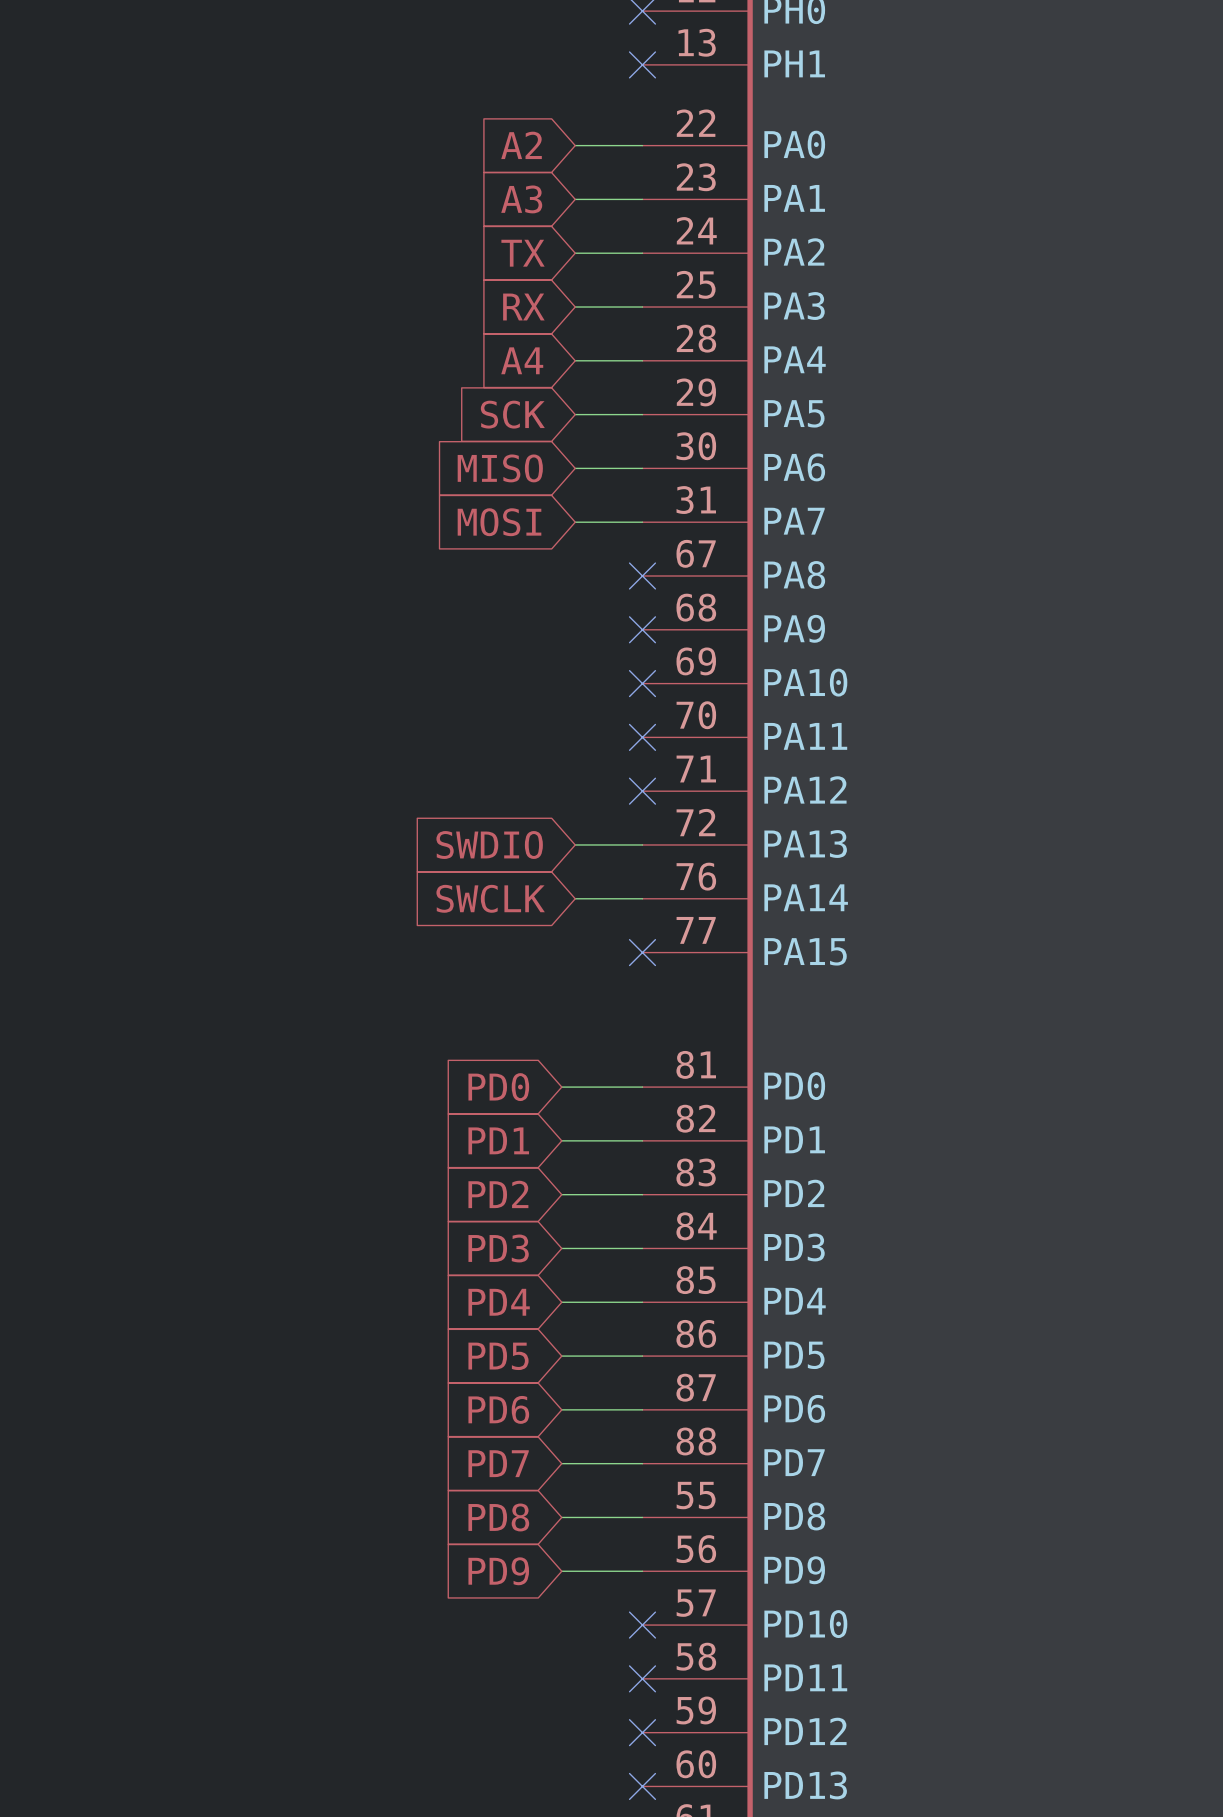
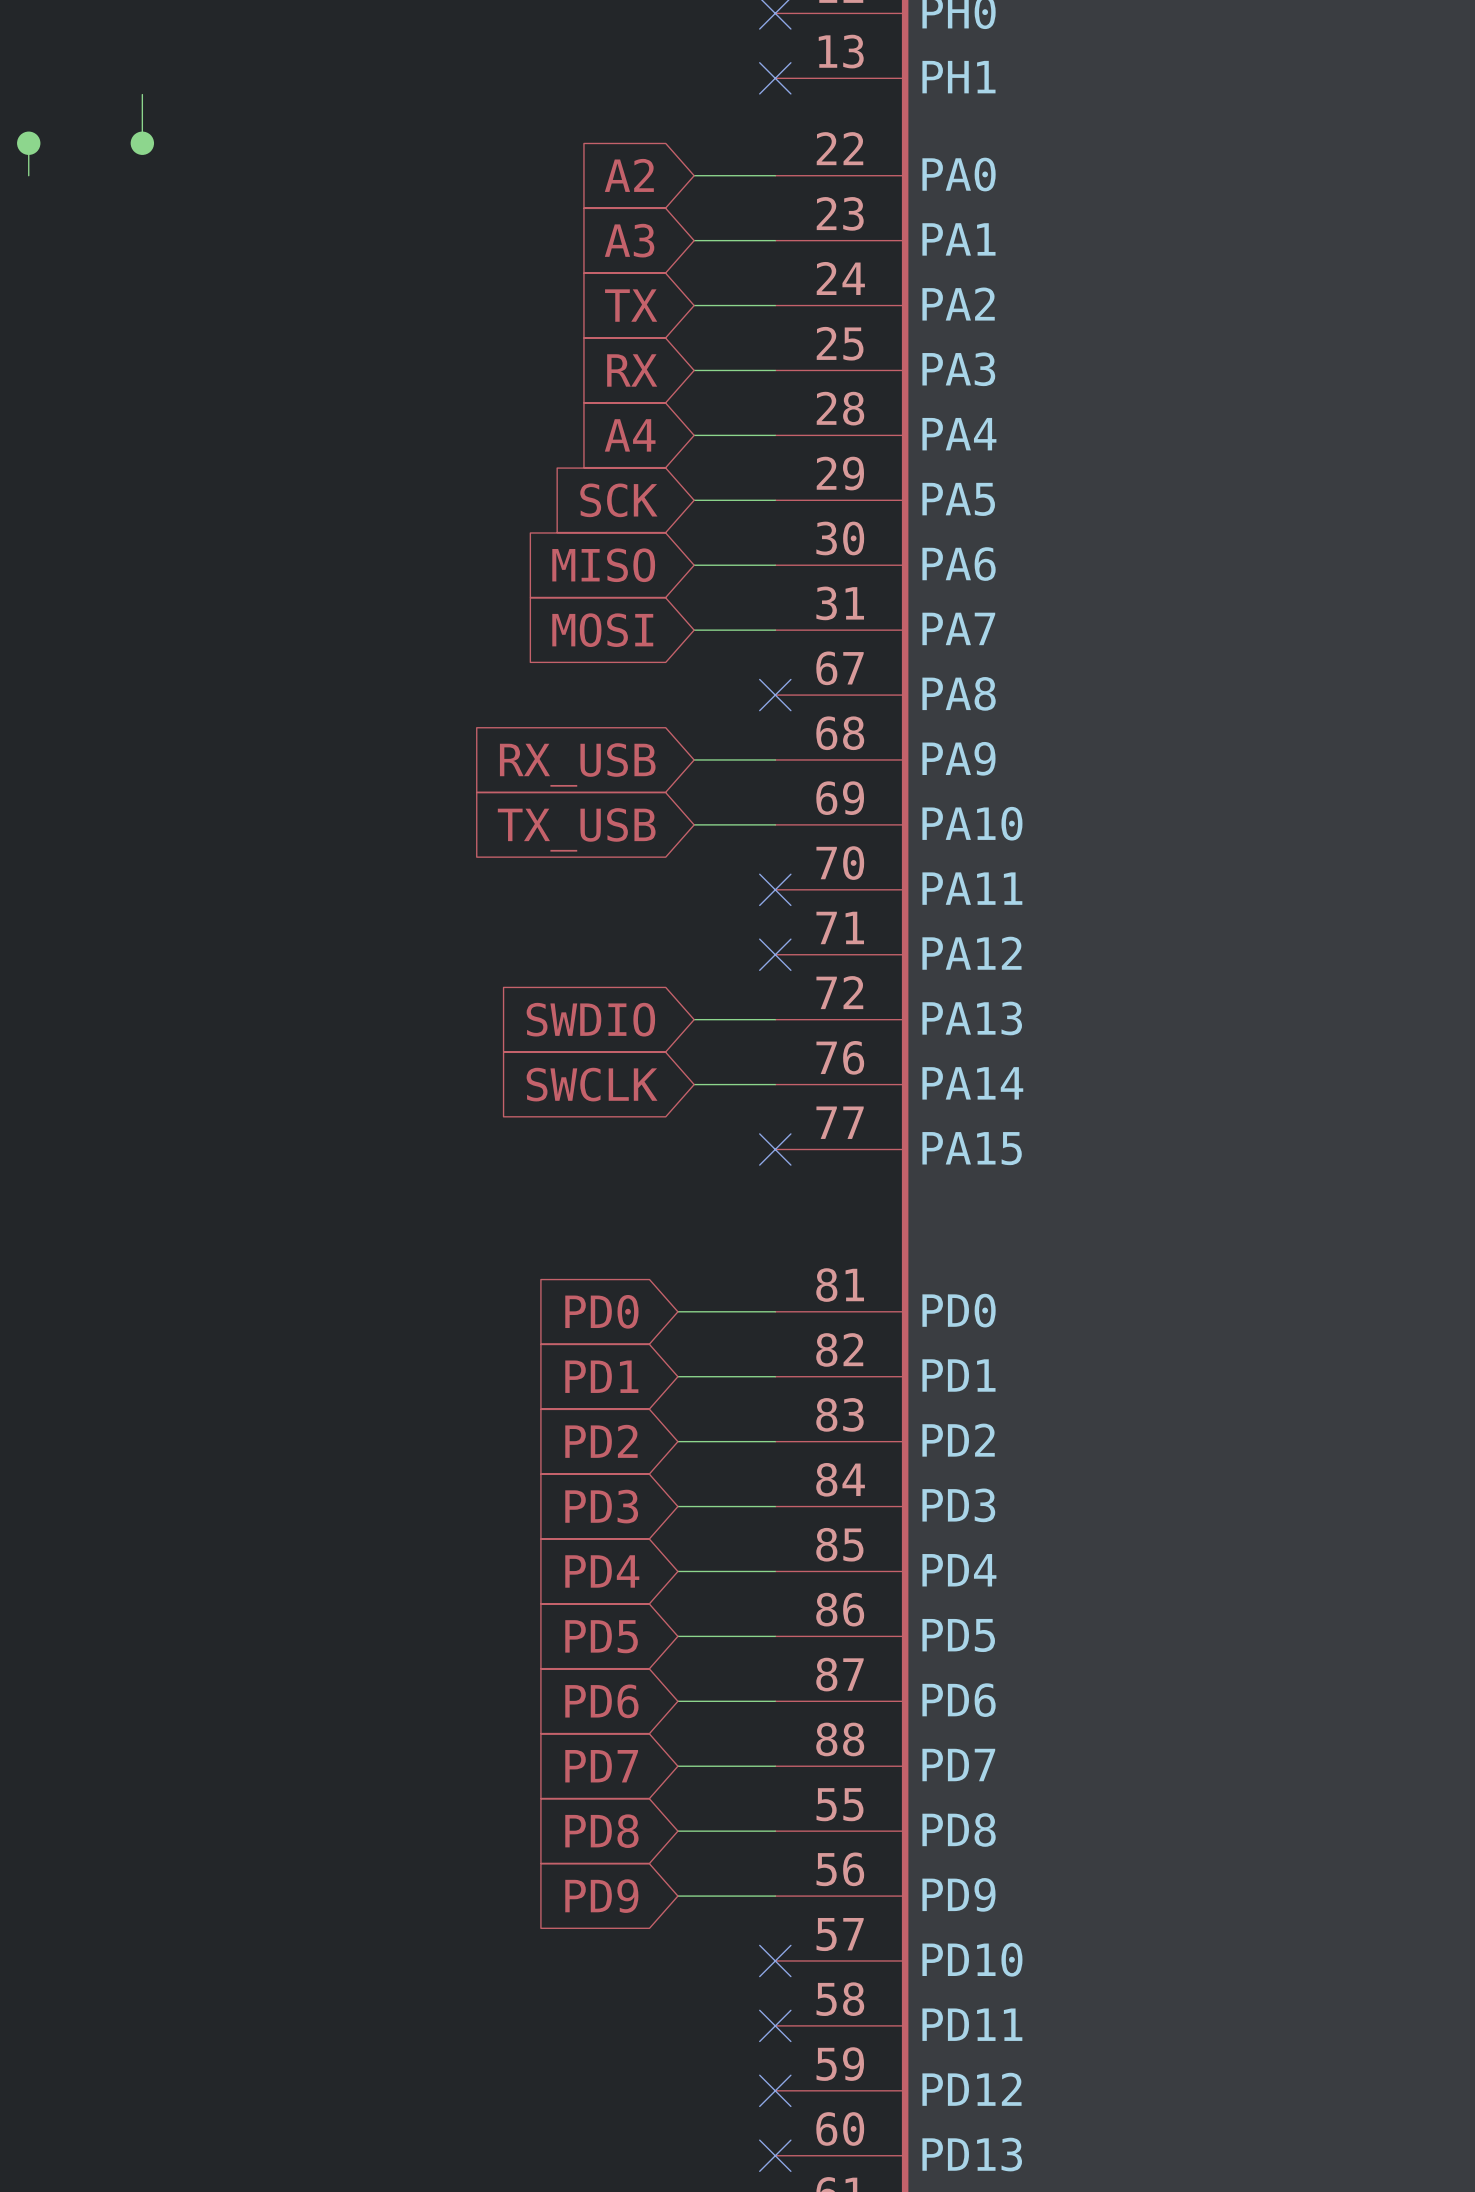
wire: none -> (142, 94) (142, 143)
wire: none -> (28, 143) (28, 175)
junction: none -> (28, 143)
junction: none -> (142, 143)
wire: none -> (694, 759) (775, 759)
no-connect mark: (642, 629) -> none
global label: none -> RX_USB (577, 764)
wire: none -> (694, 824) (775, 824)
no-connect mark: (642, 683) -> none
global label: none -> TX_USB (576, 829)

